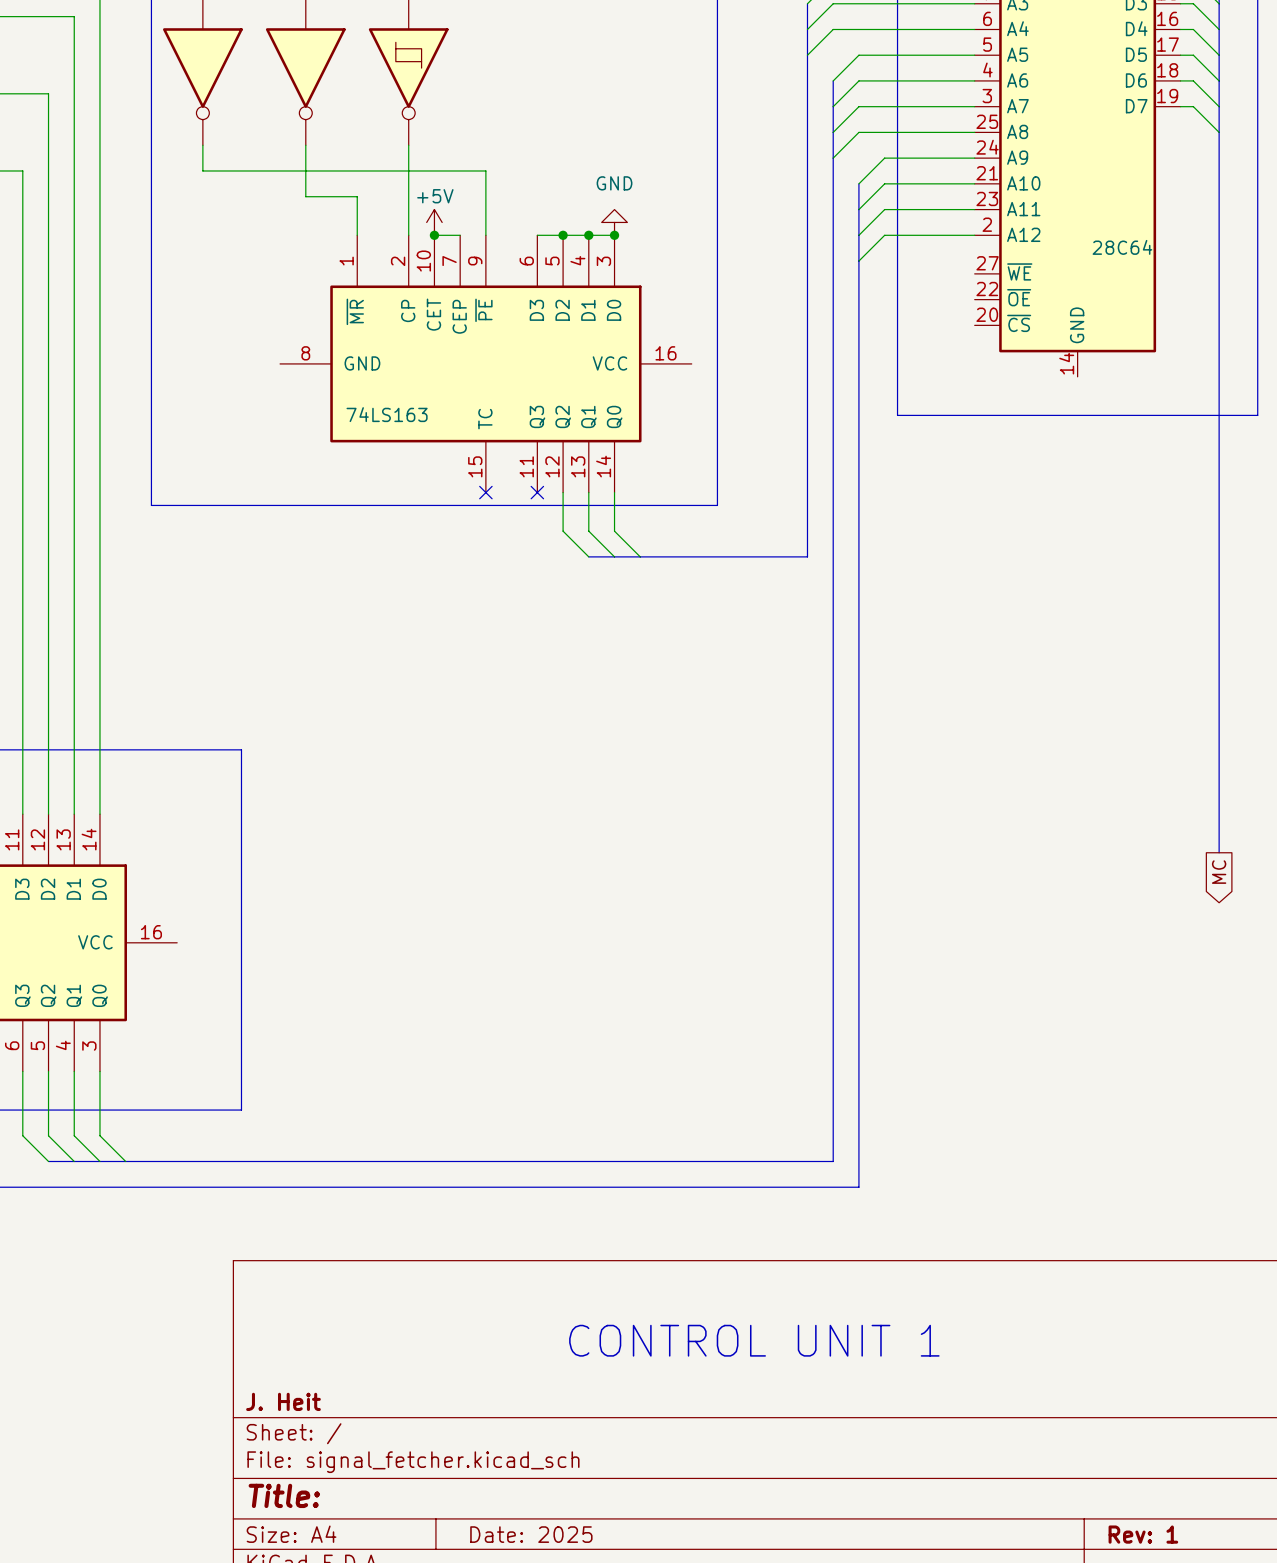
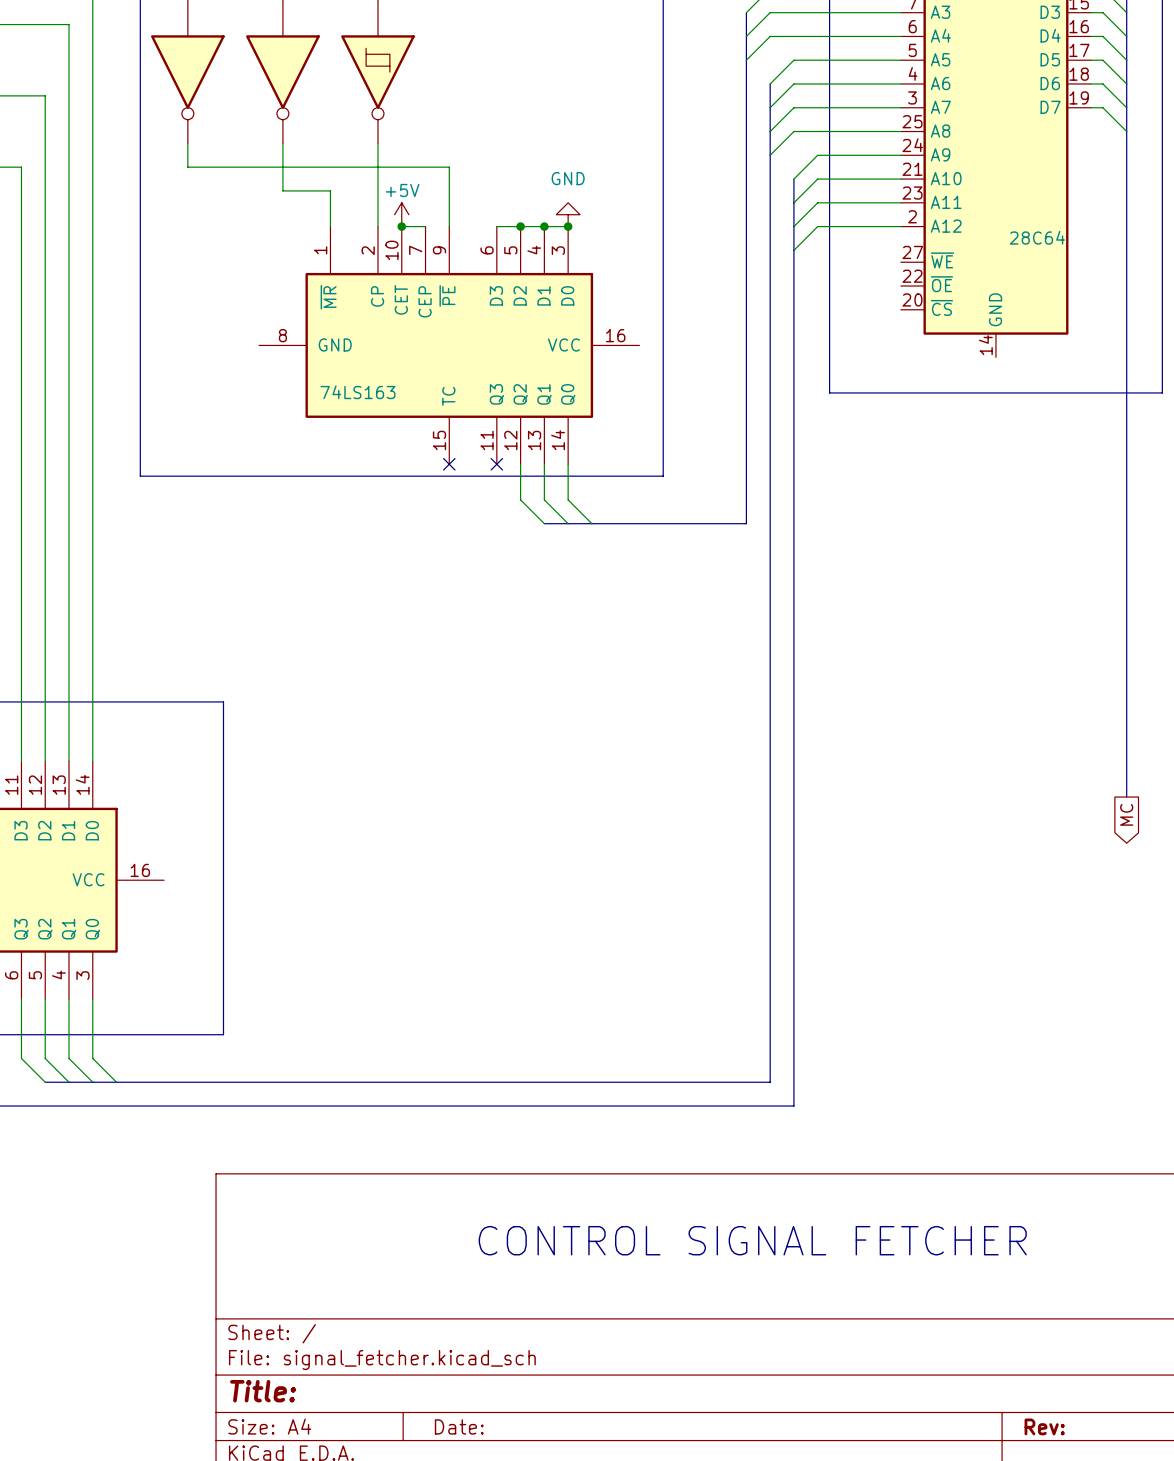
text: none -> CONTROL SIGNAL FETCHER (752, 1240)
text: CONTROL UNIT 1 (754, 1340) -> none
title block: J. Heit (283, 1401) -> none
title block: Date: 2025 (531, 1534) -> Date: (459, 1426)
title block: Rev: 1 (1143, 1534) -> Rev: (1044, 1426)

